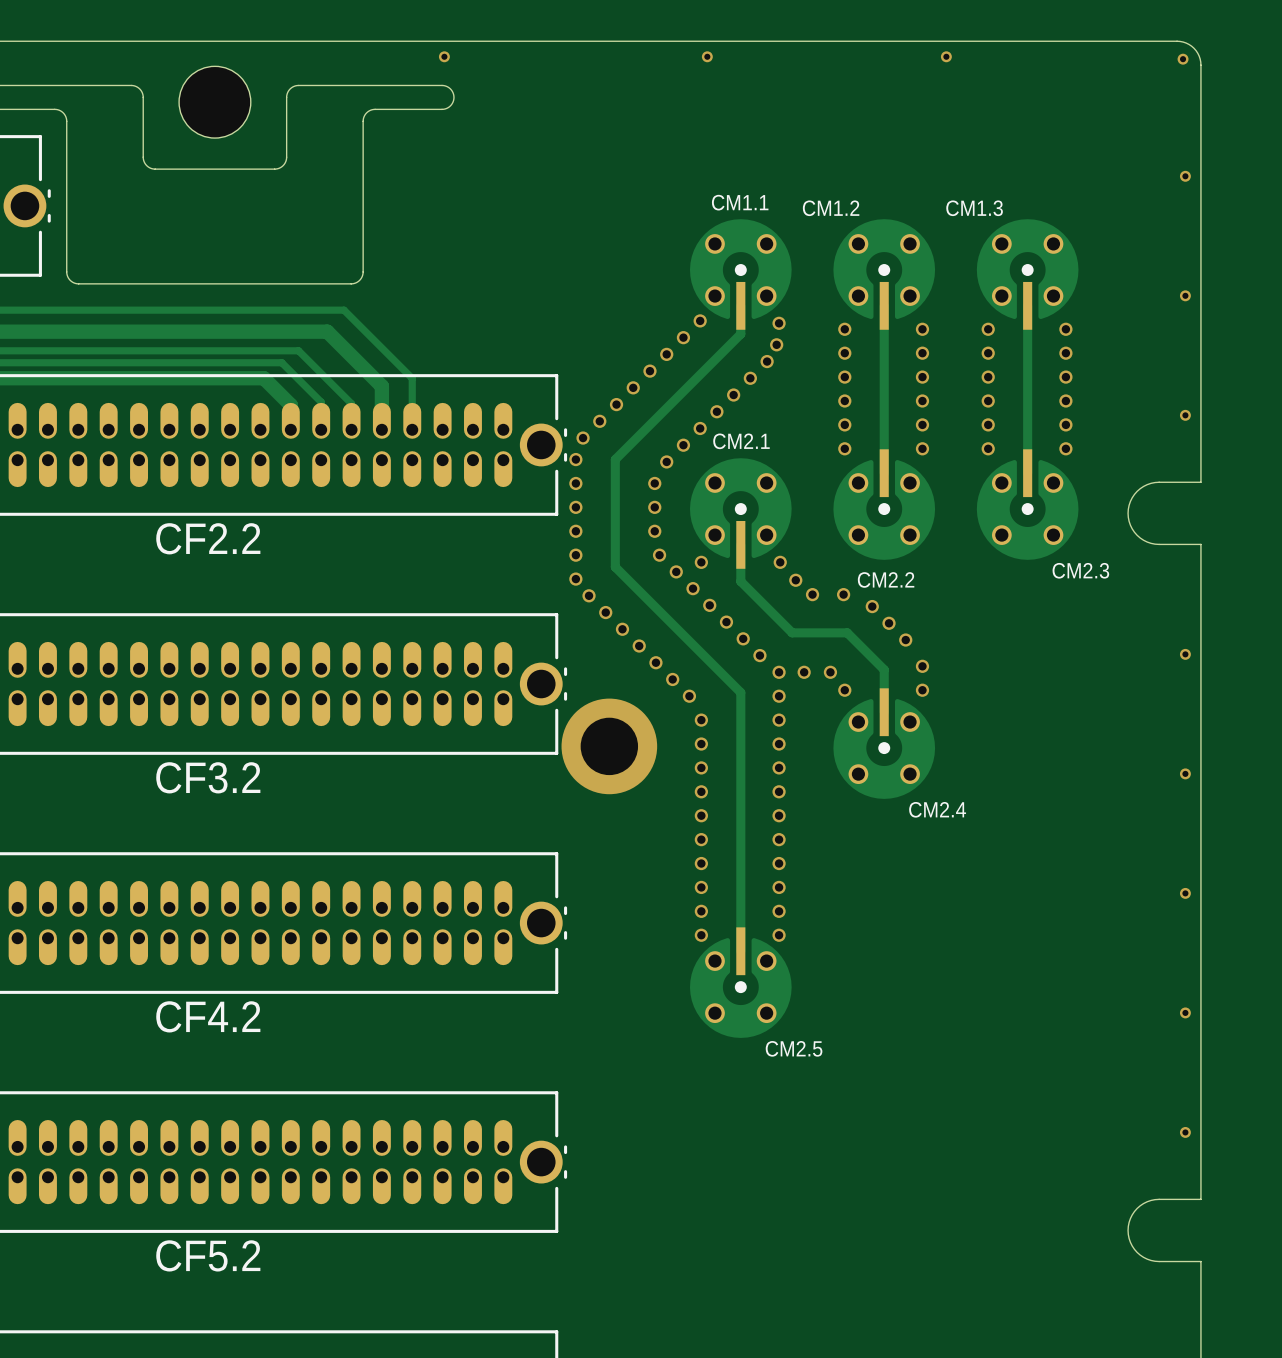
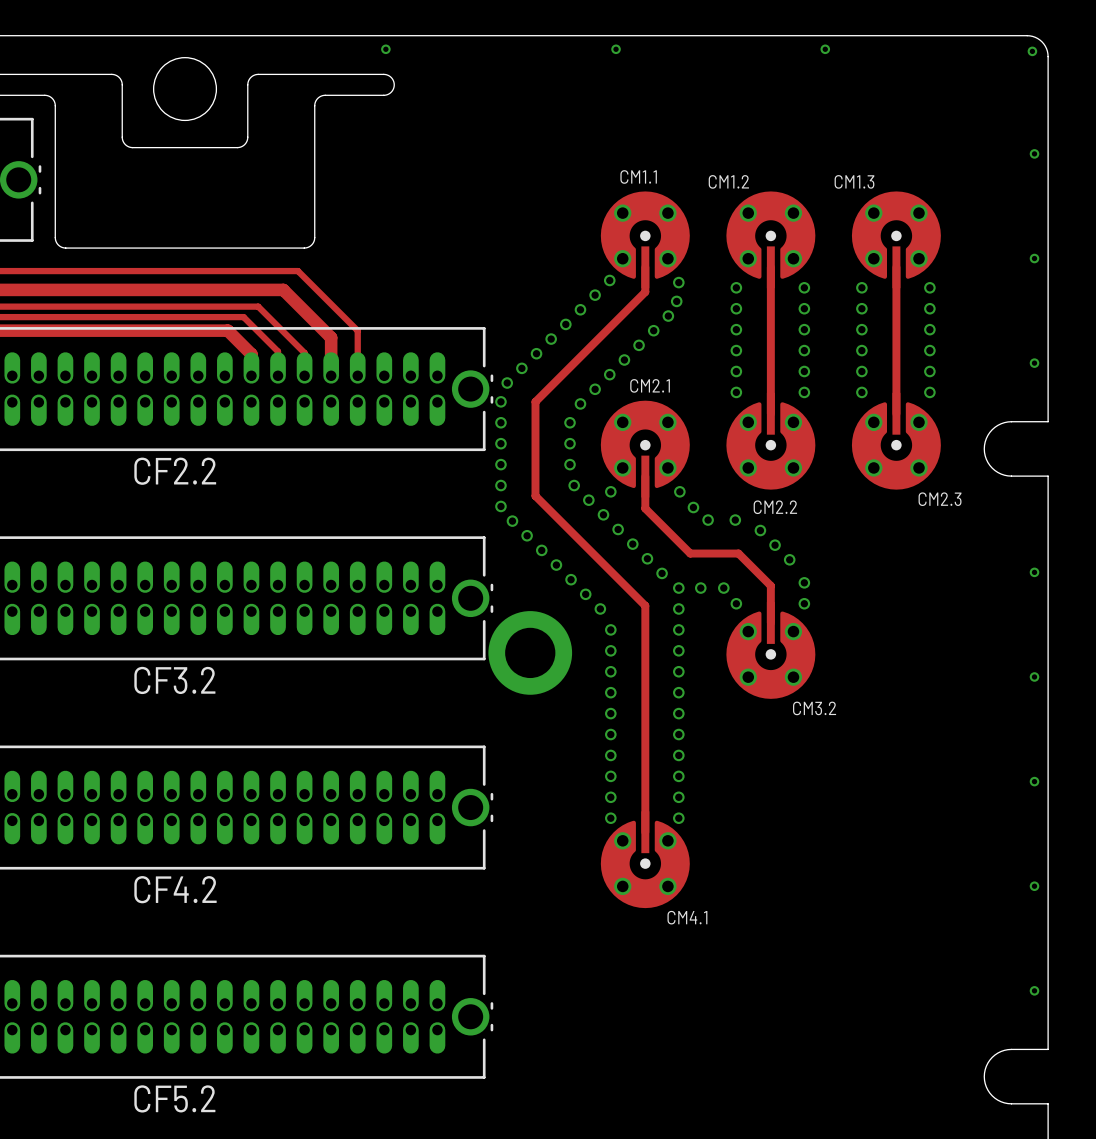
CM2.4 name: CM2.4 (937, 809) -> CM3.2 (814, 708)
CM2.5 name: CM2.5 (794, 1048) -> CM4.1 (687, 917)

